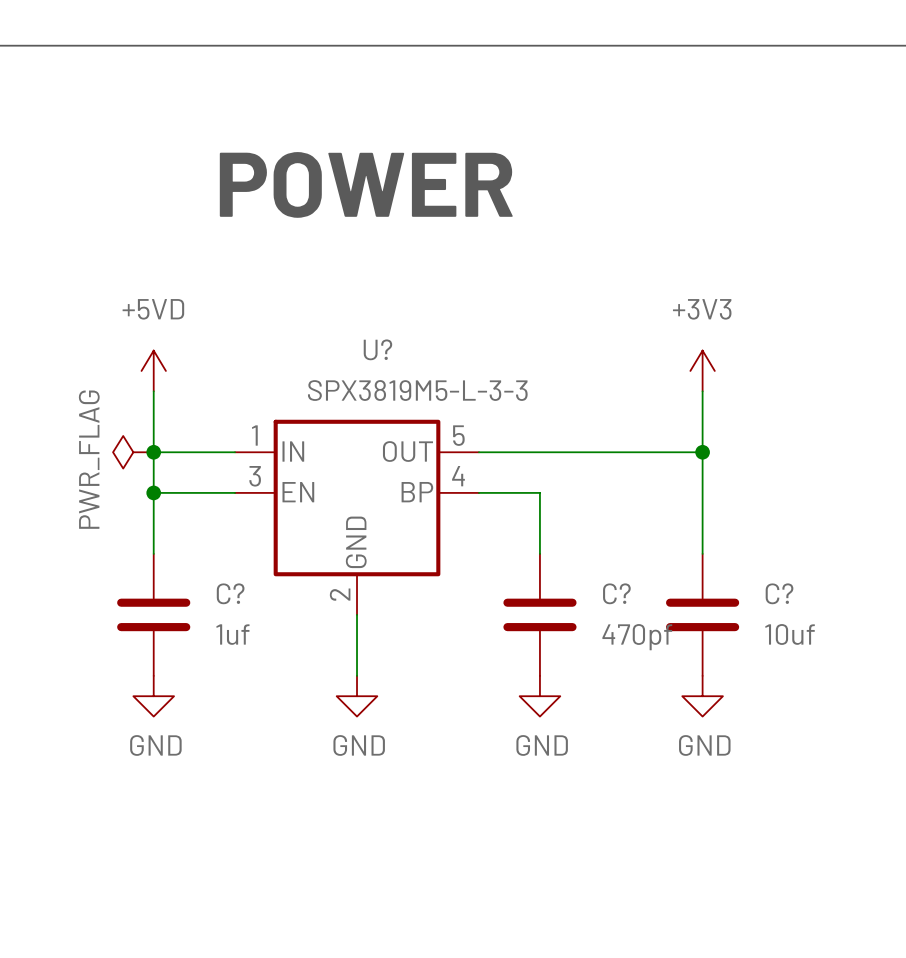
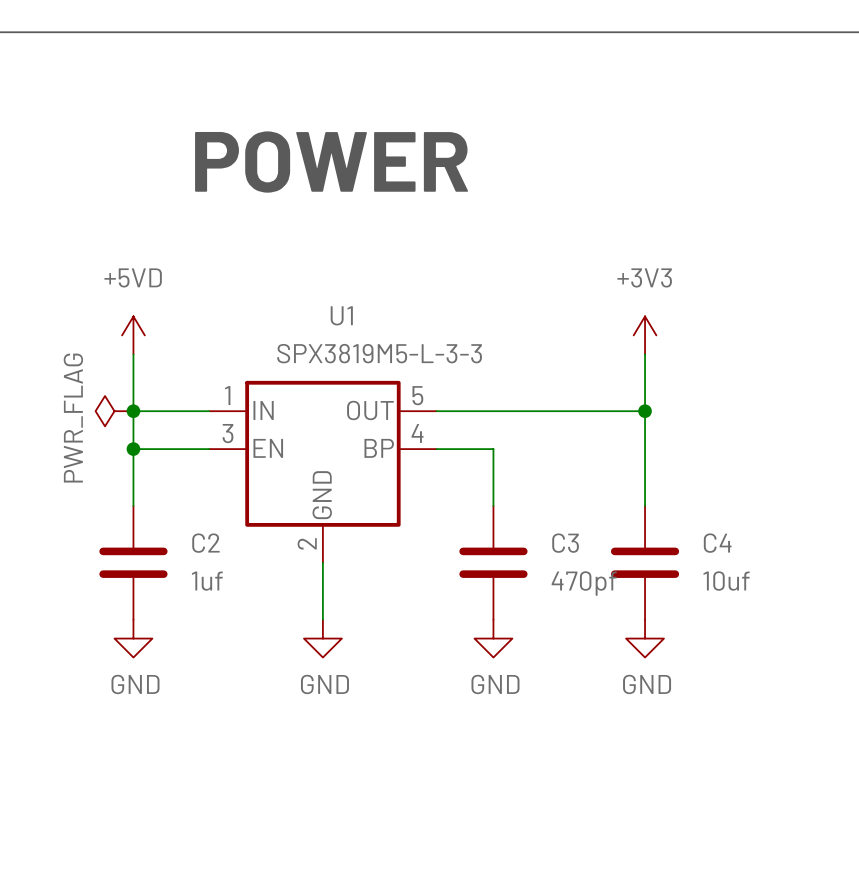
U? name: U? (377, 349) -> U1 (341, 315)
C? name: C? (230, 593) -> C2 (205, 543)
C? name: C? (616, 593) -> C3 (565, 543)
C? name: C? (779, 593) -> C4 (717, 543)

